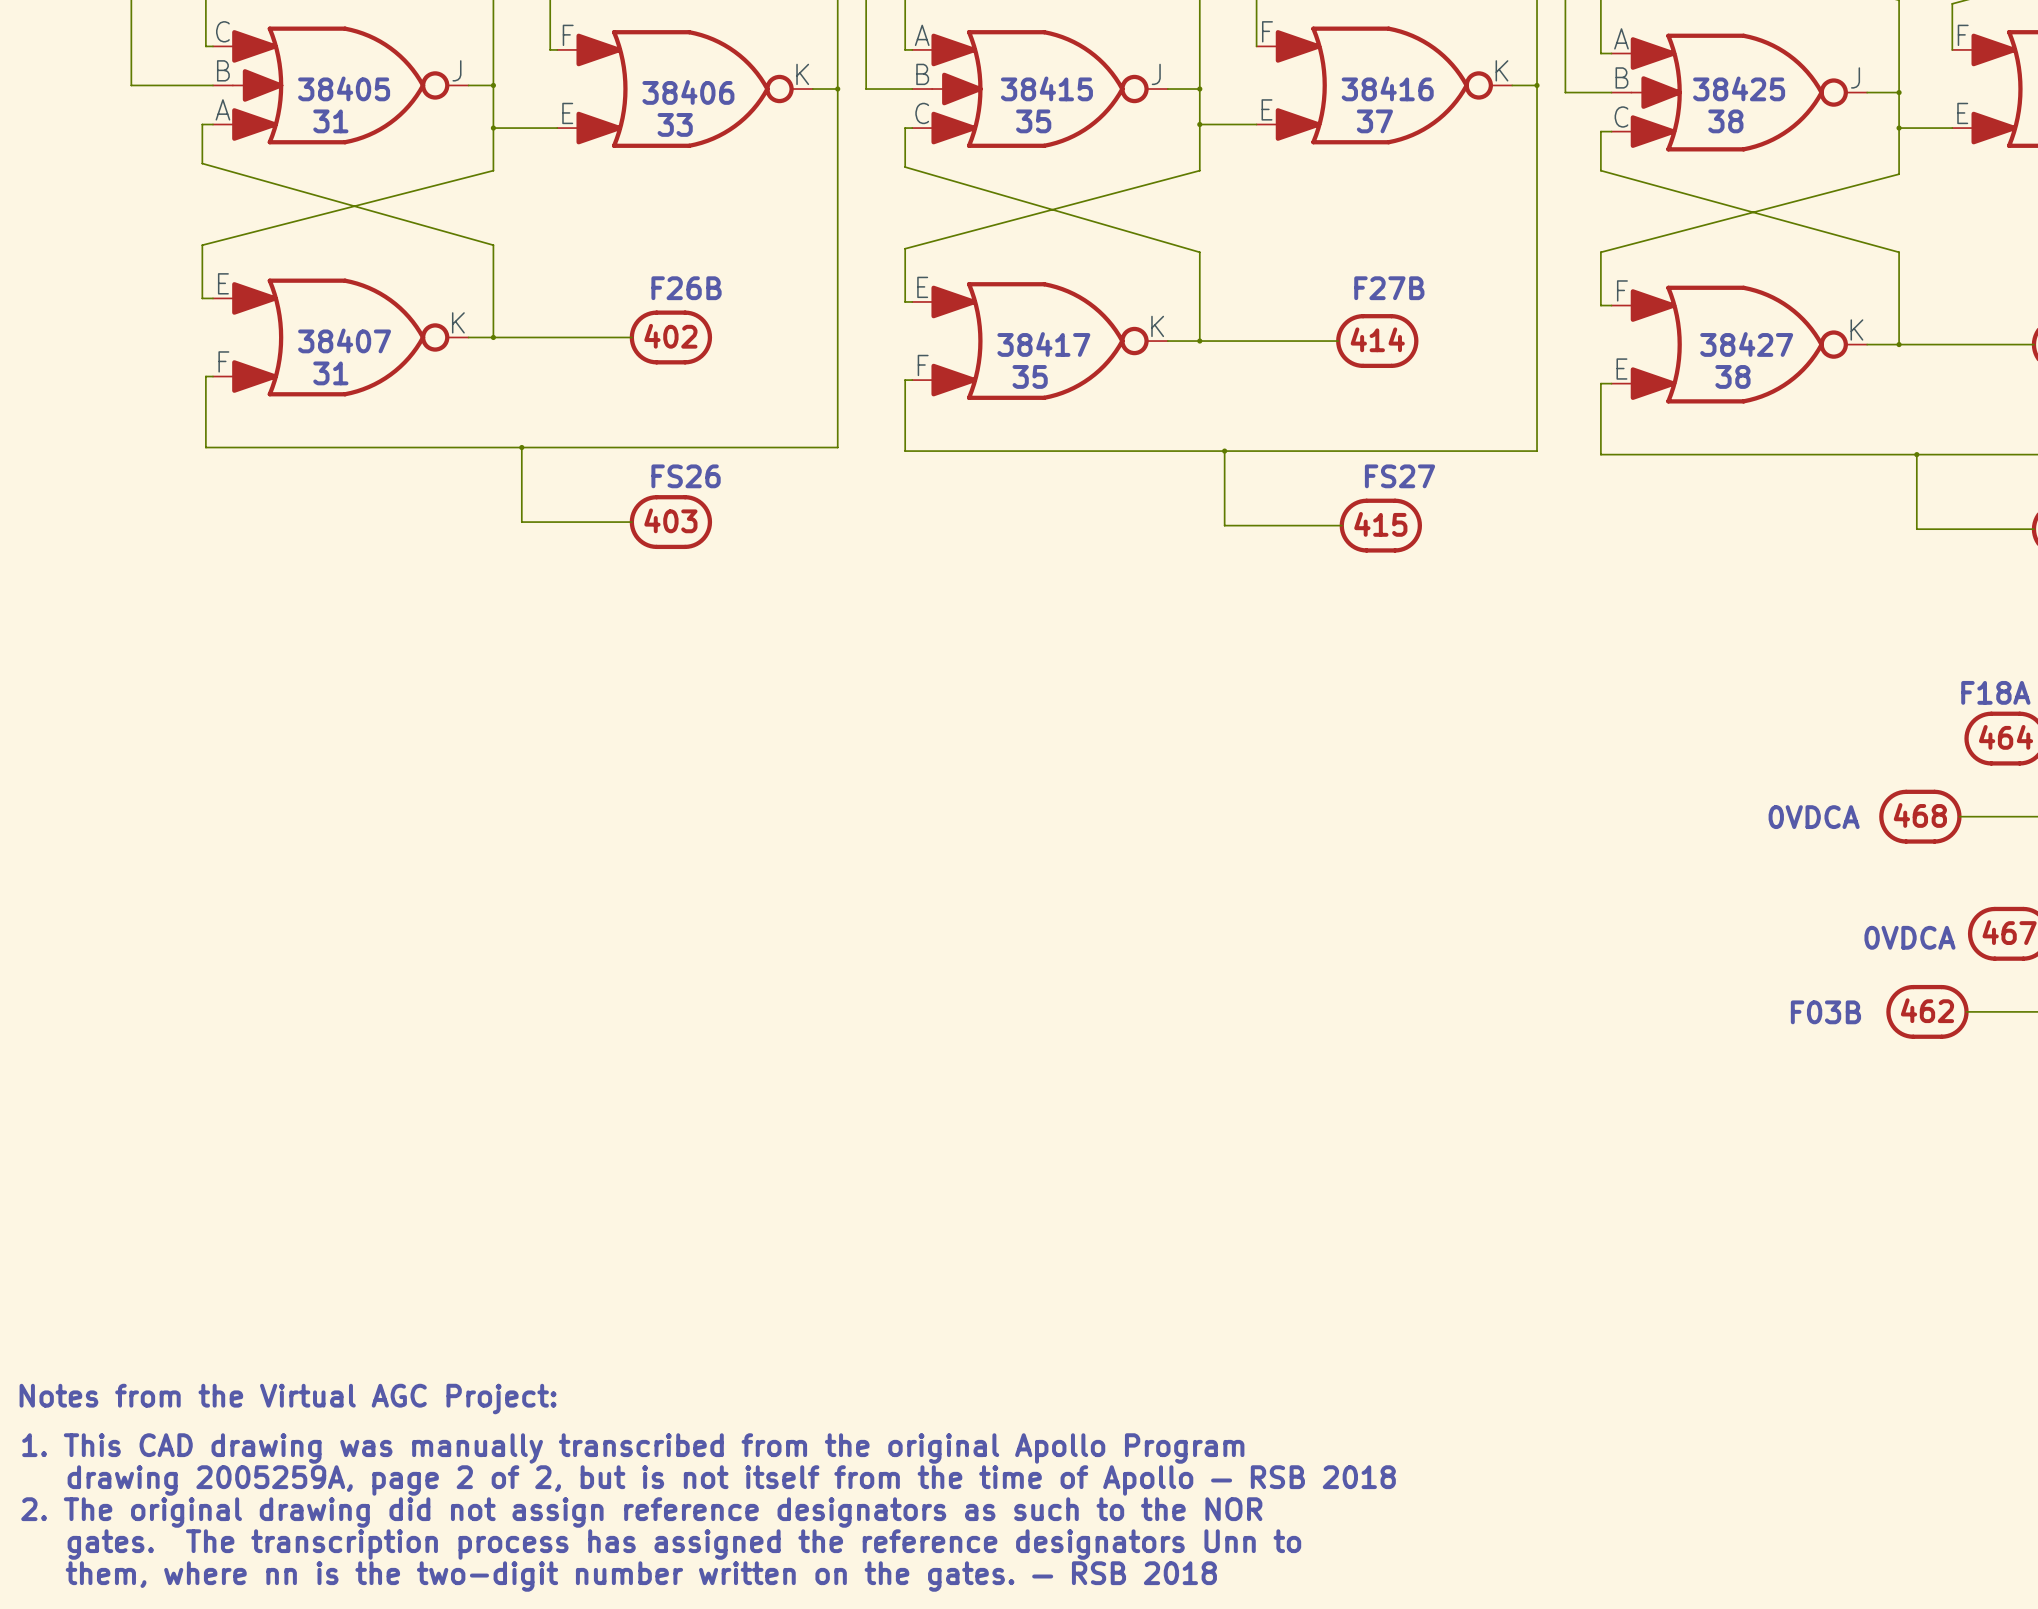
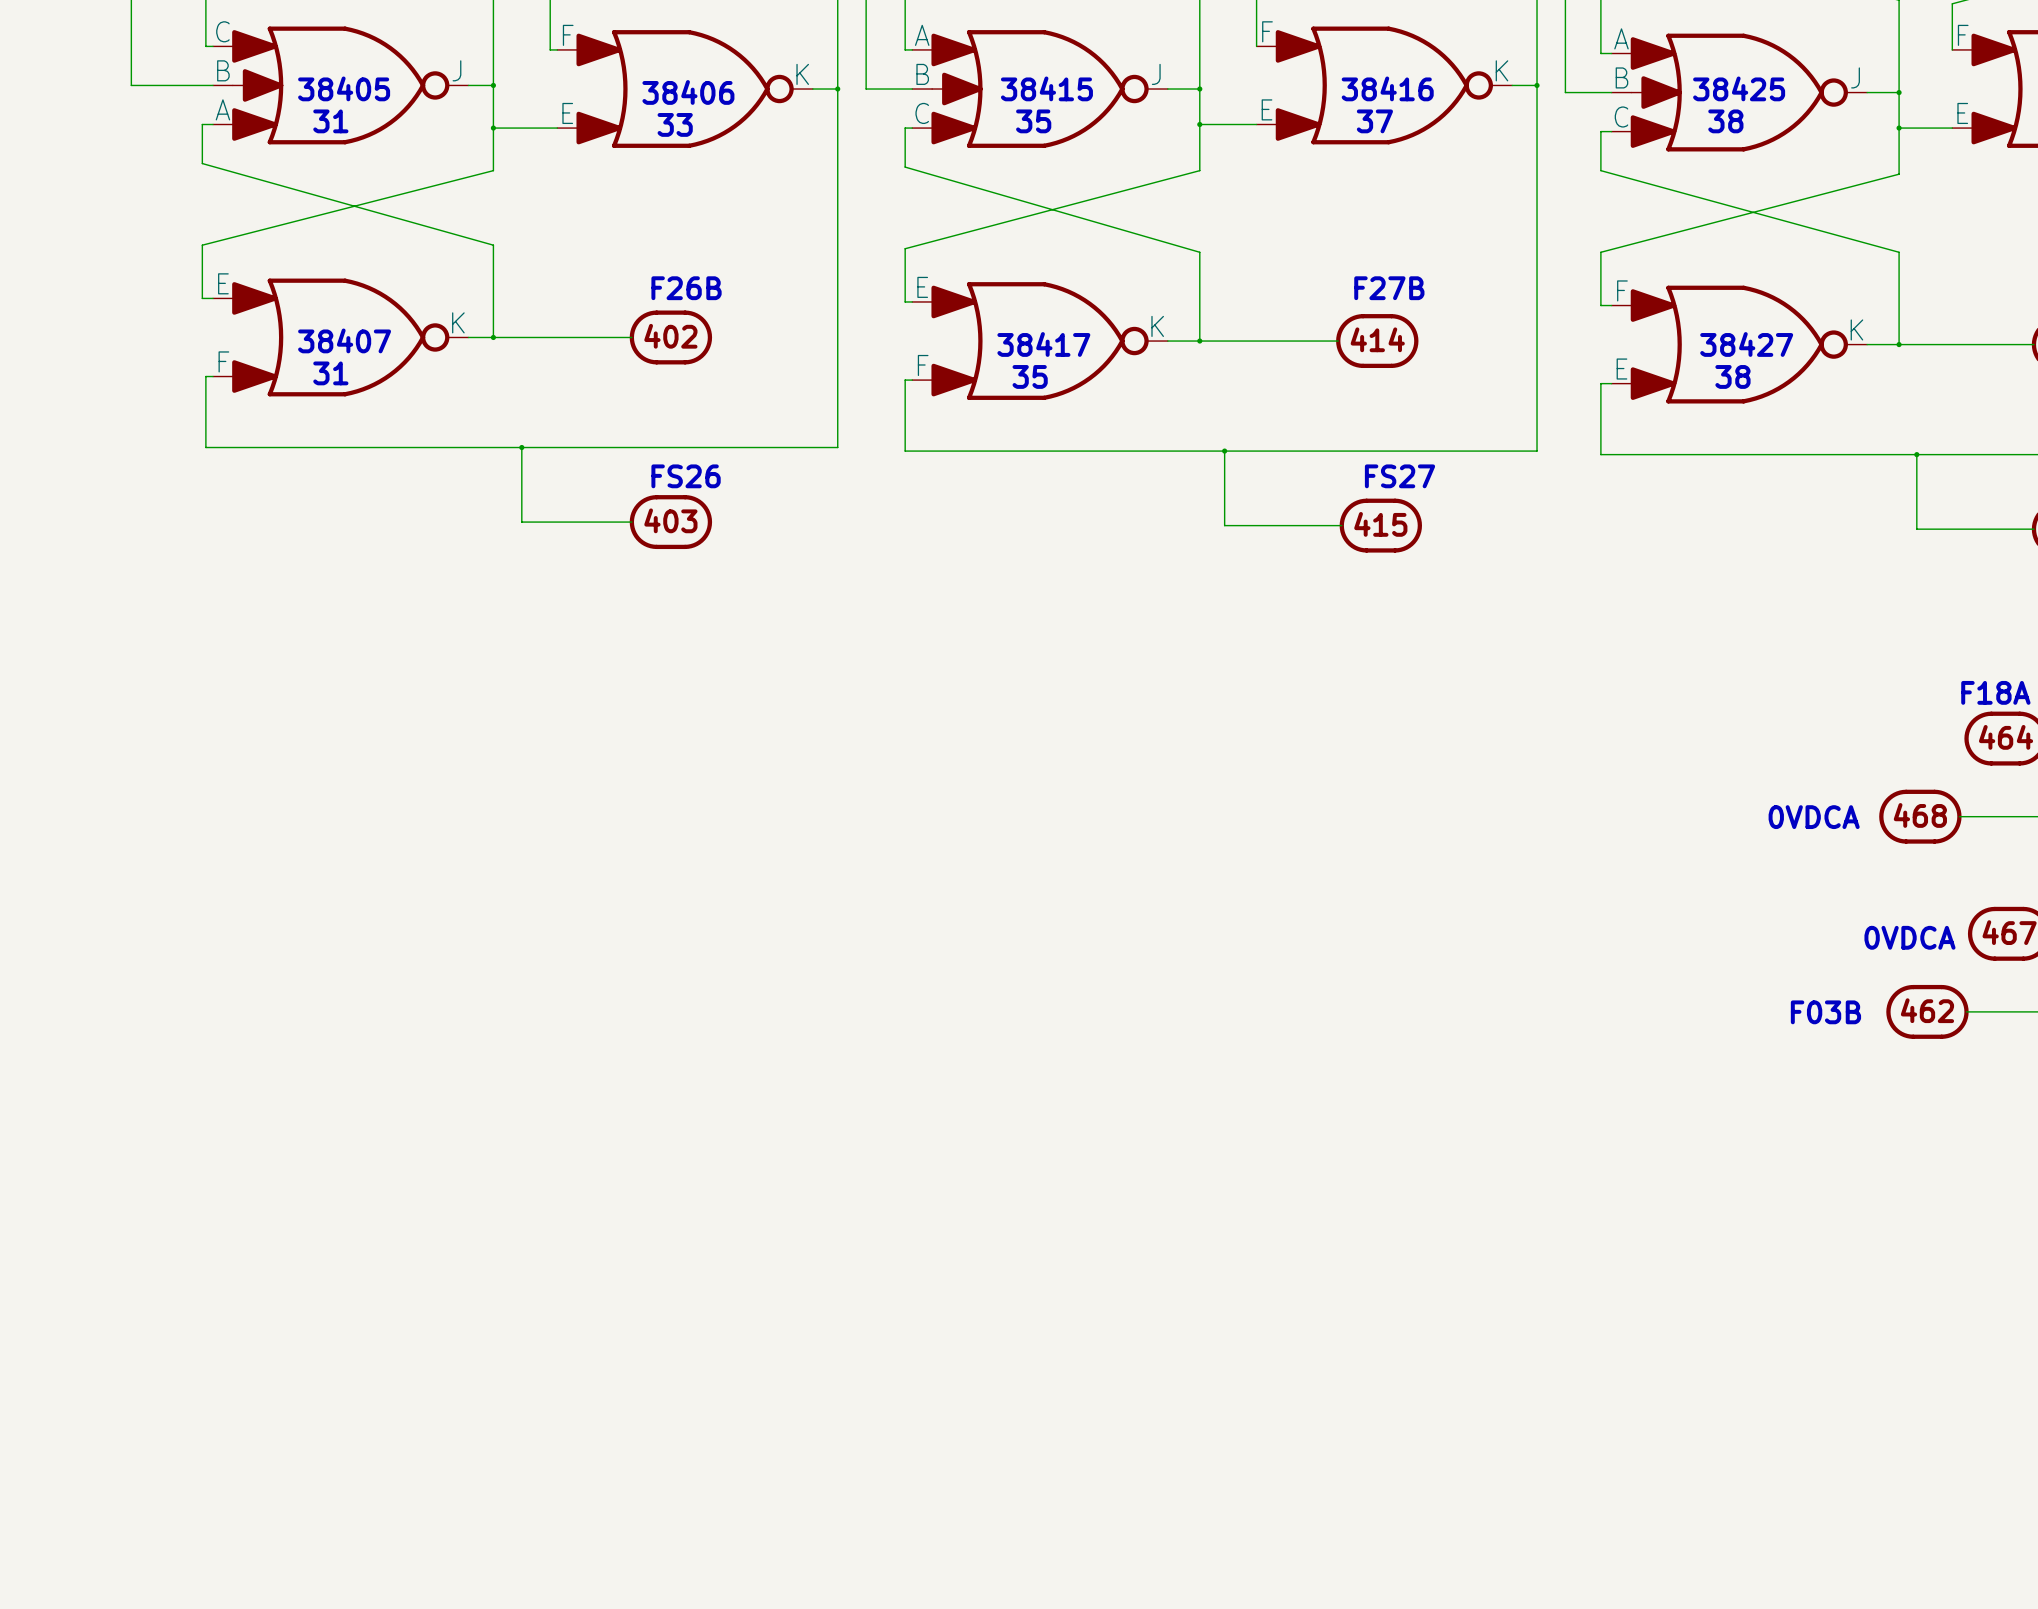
text: Notes from the Virtual AGC Project: (288, 1399) -> none
text: 1. This CAD drawing was manually transcribed from the original Apollo Program (633, 1448) -> none
text: drawing 2005259A, page 2 of 2, but is not itself from the time of Apollo — RSB 2018 (731, 1480) -> none
text: 2. The original drawing did not assign reference designators as such to the NOR (641, 1512) -> none
text: gates. The transcription process has assigned the reference designators Unn to (684, 1544) -> none
text: them, where nn is the two-digit number written on the gates. — RSB 2018 (641, 1576) -> none

